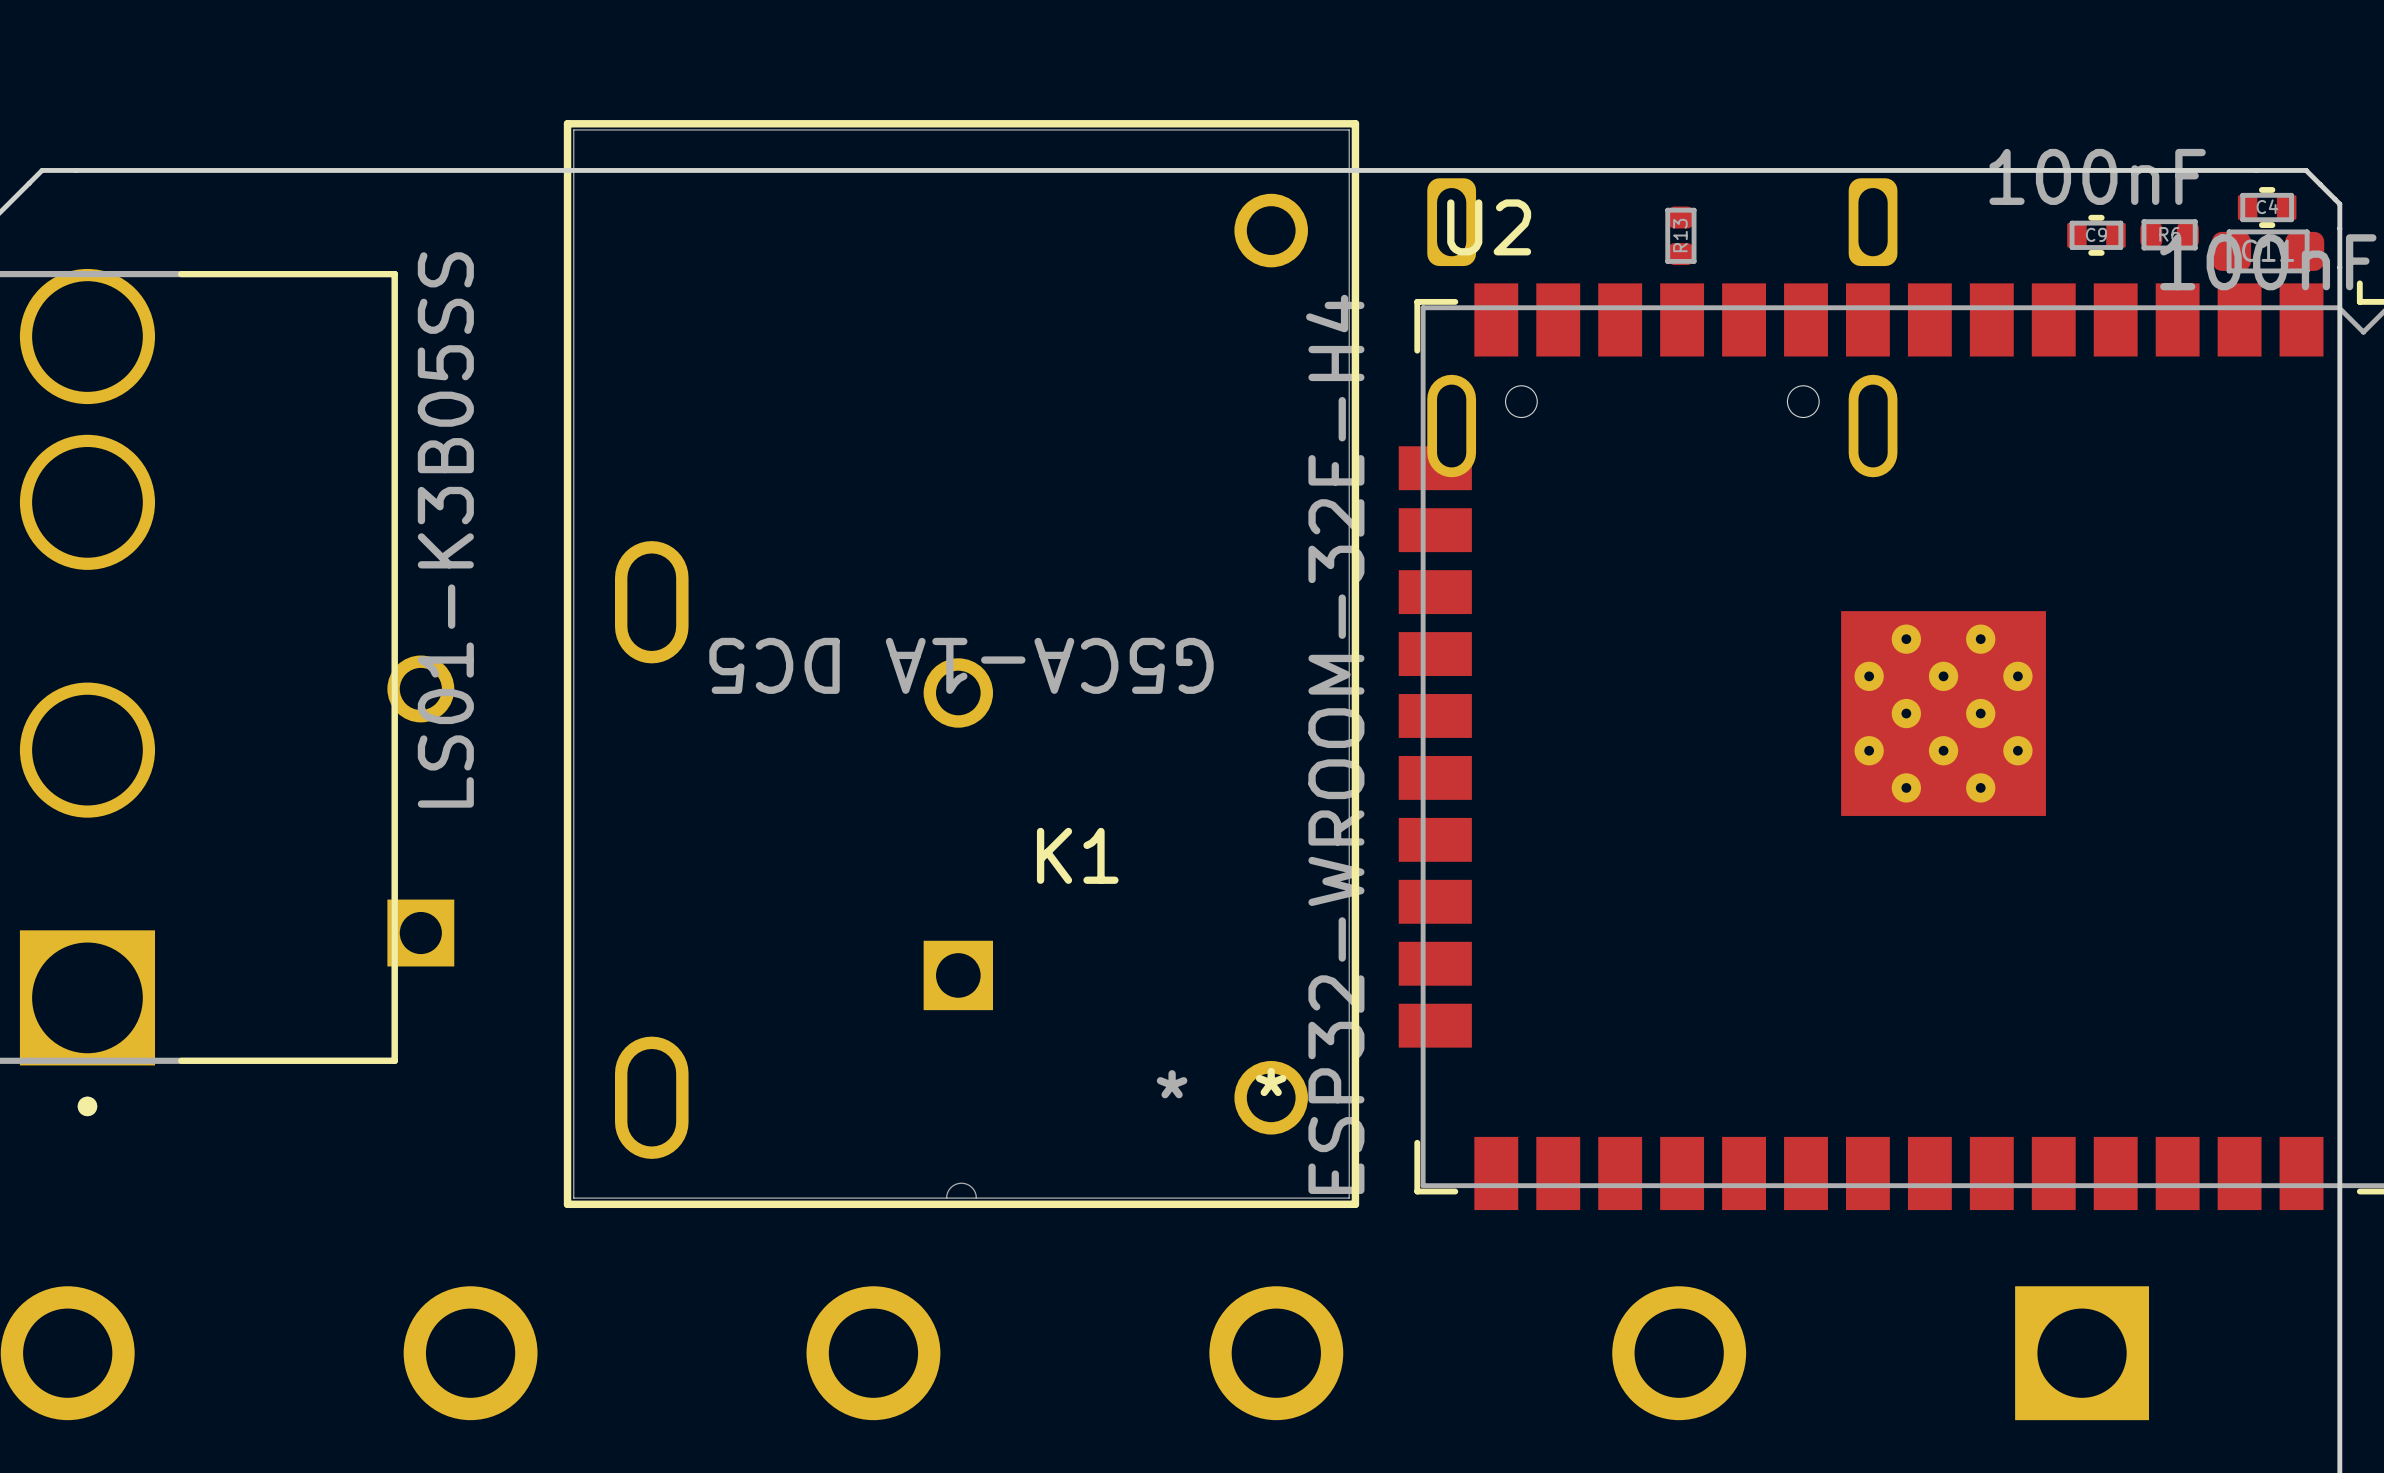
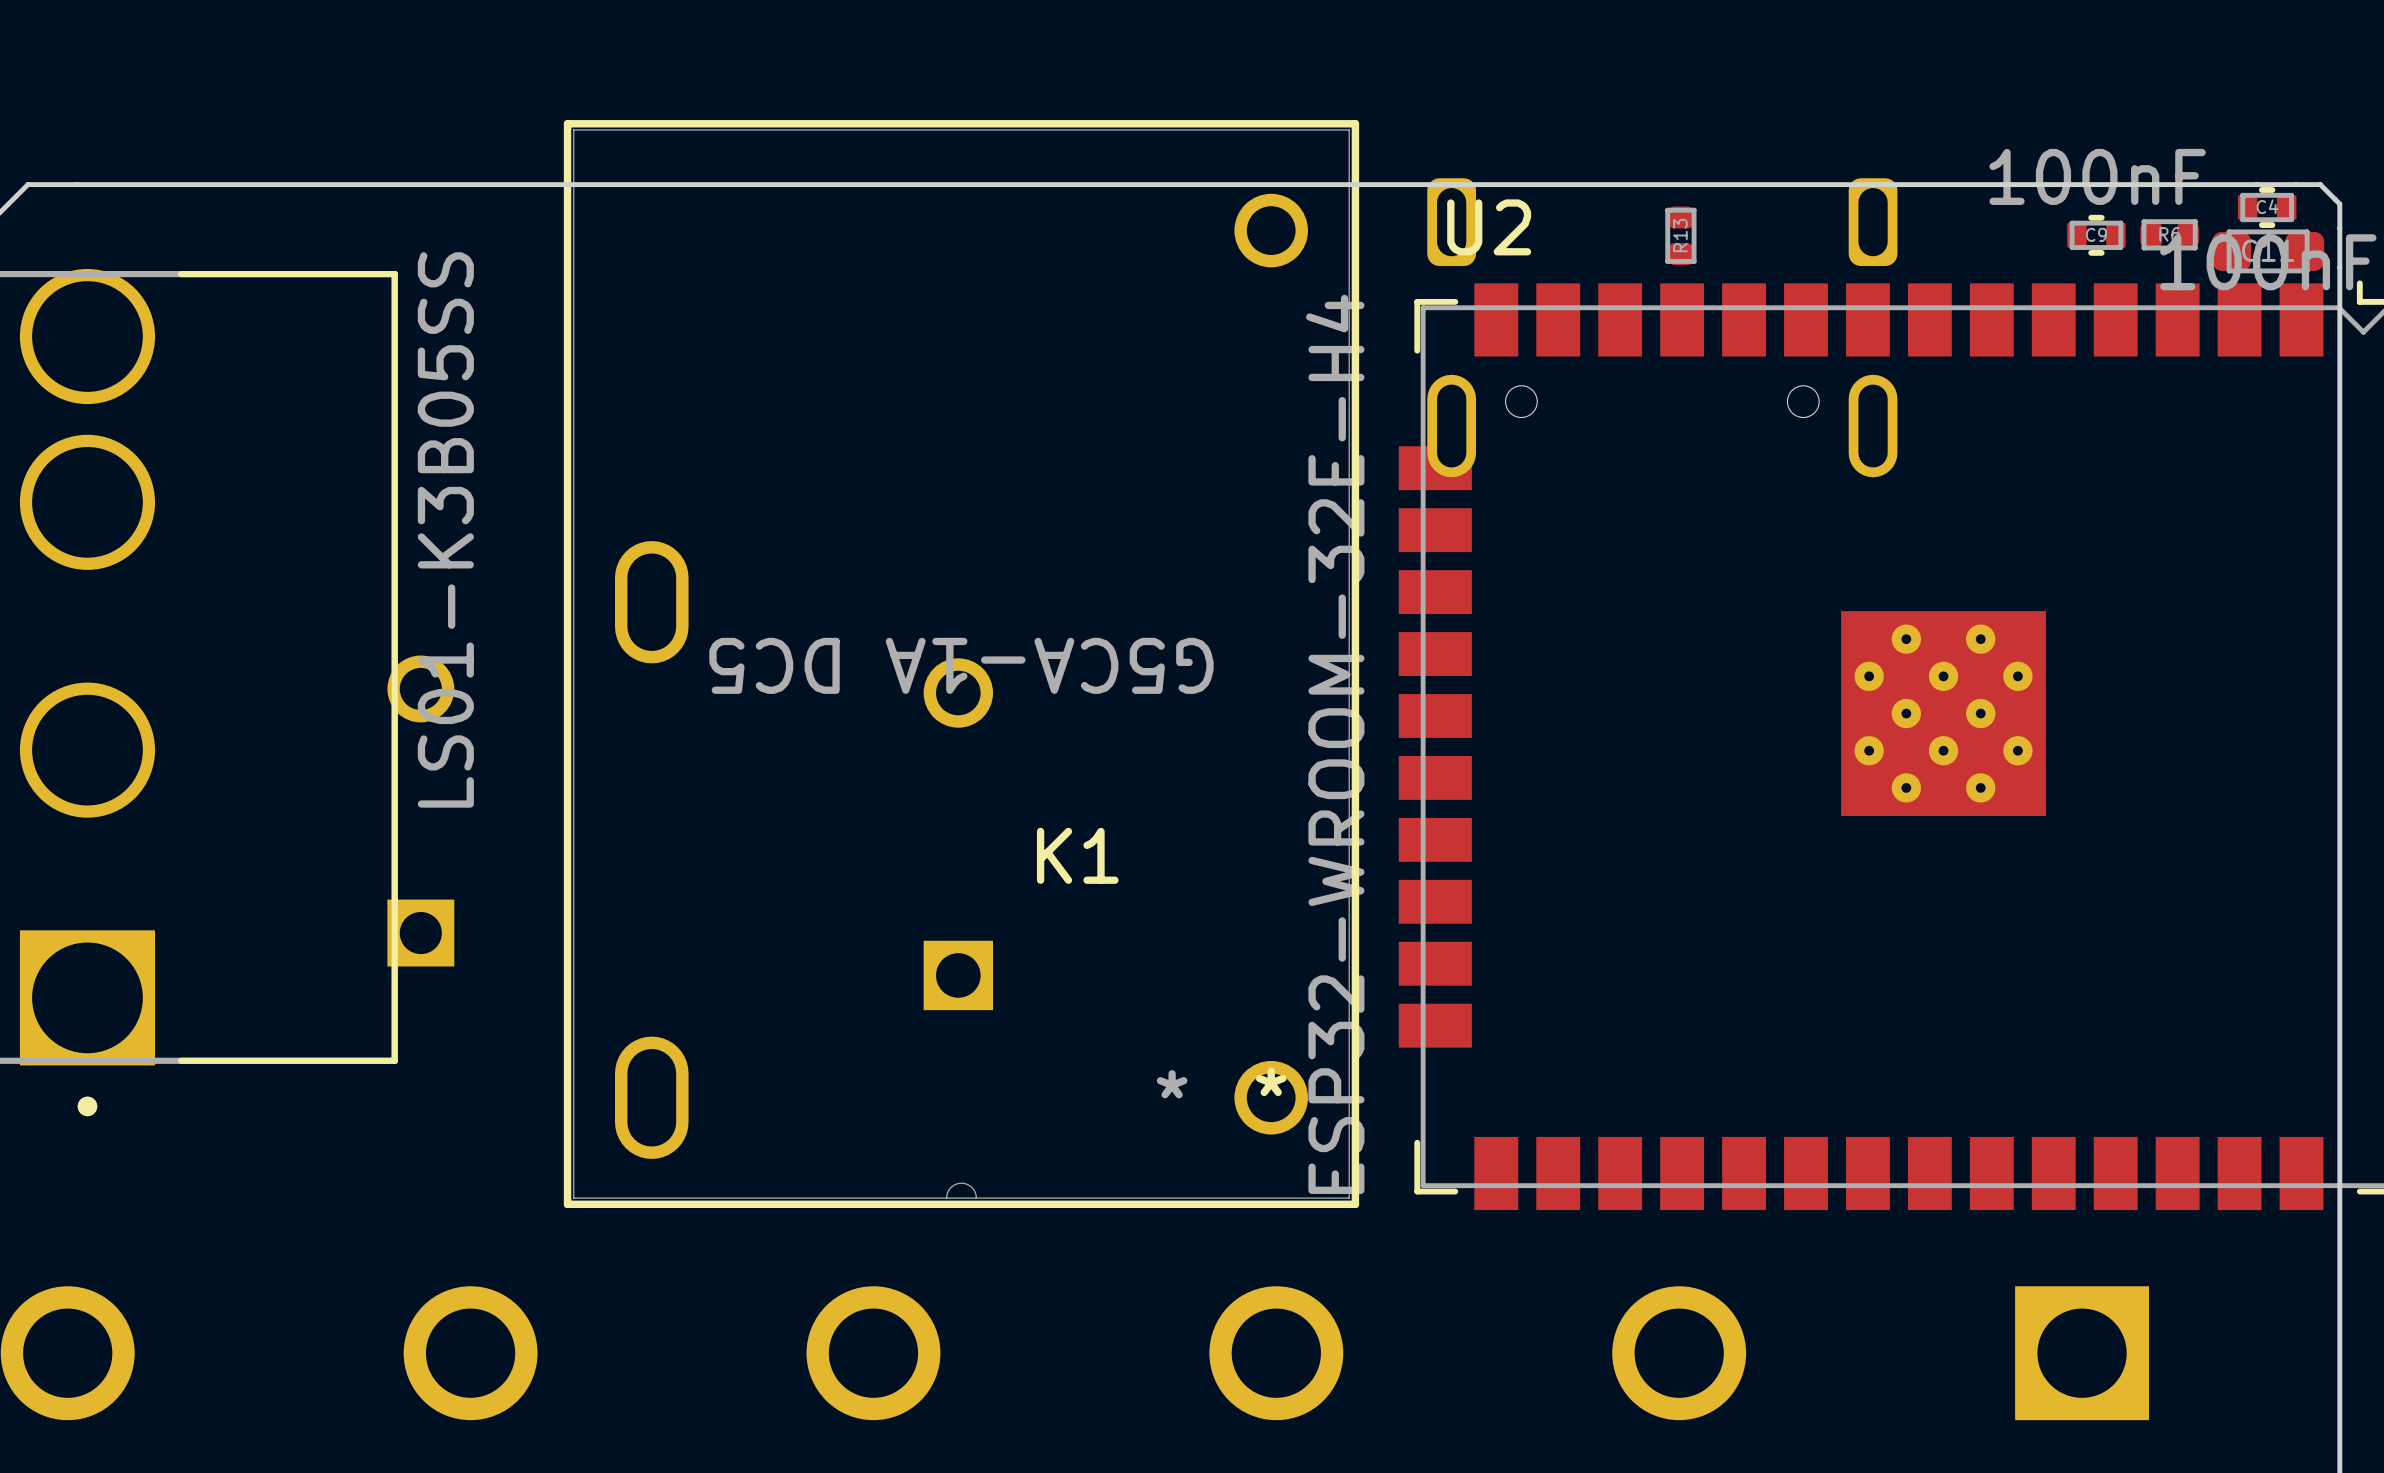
board edge: (27, 184) (42, 170) (2306, 170) (2320, 184) -> (27, 184) (2320, 184)

